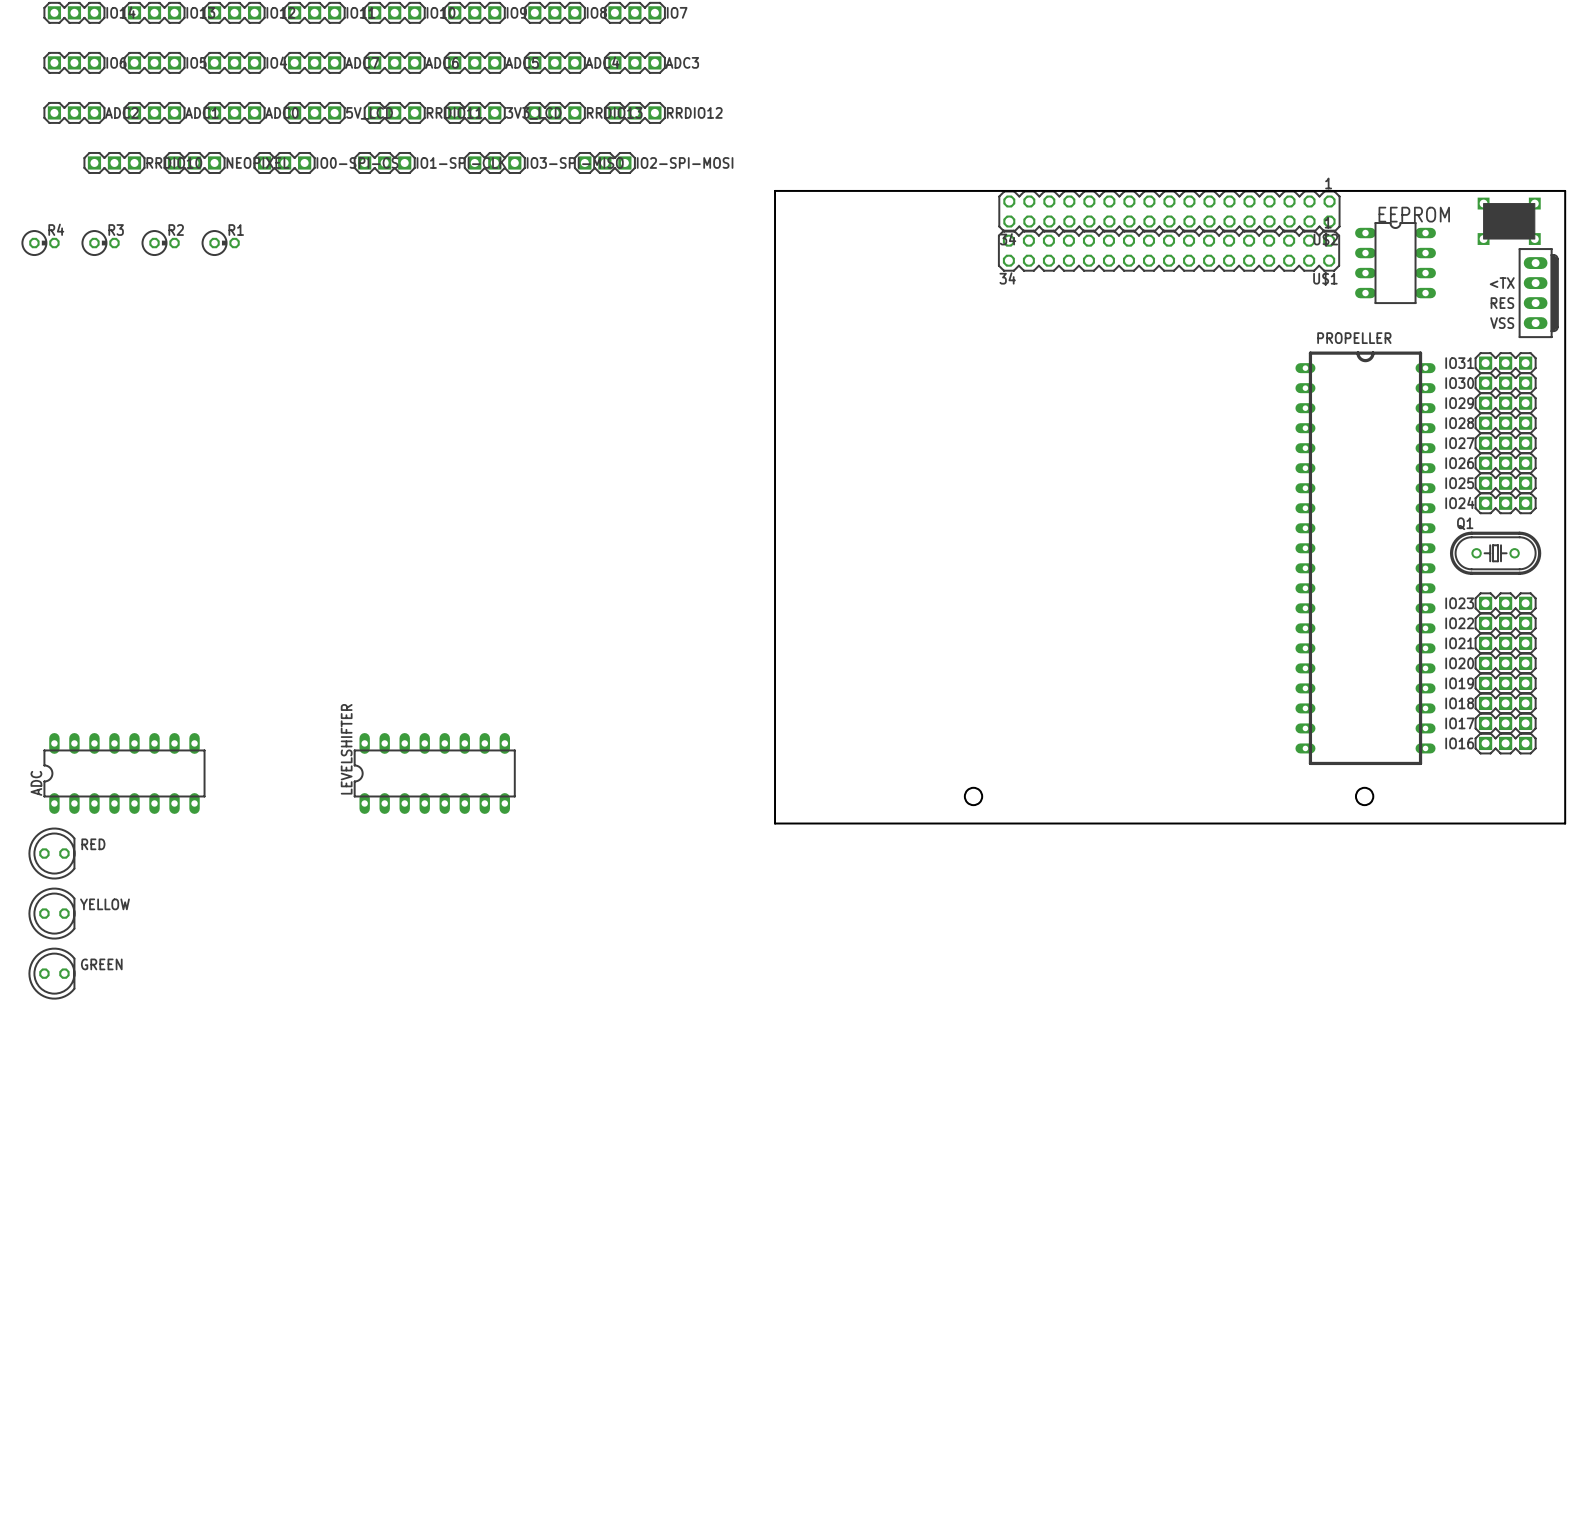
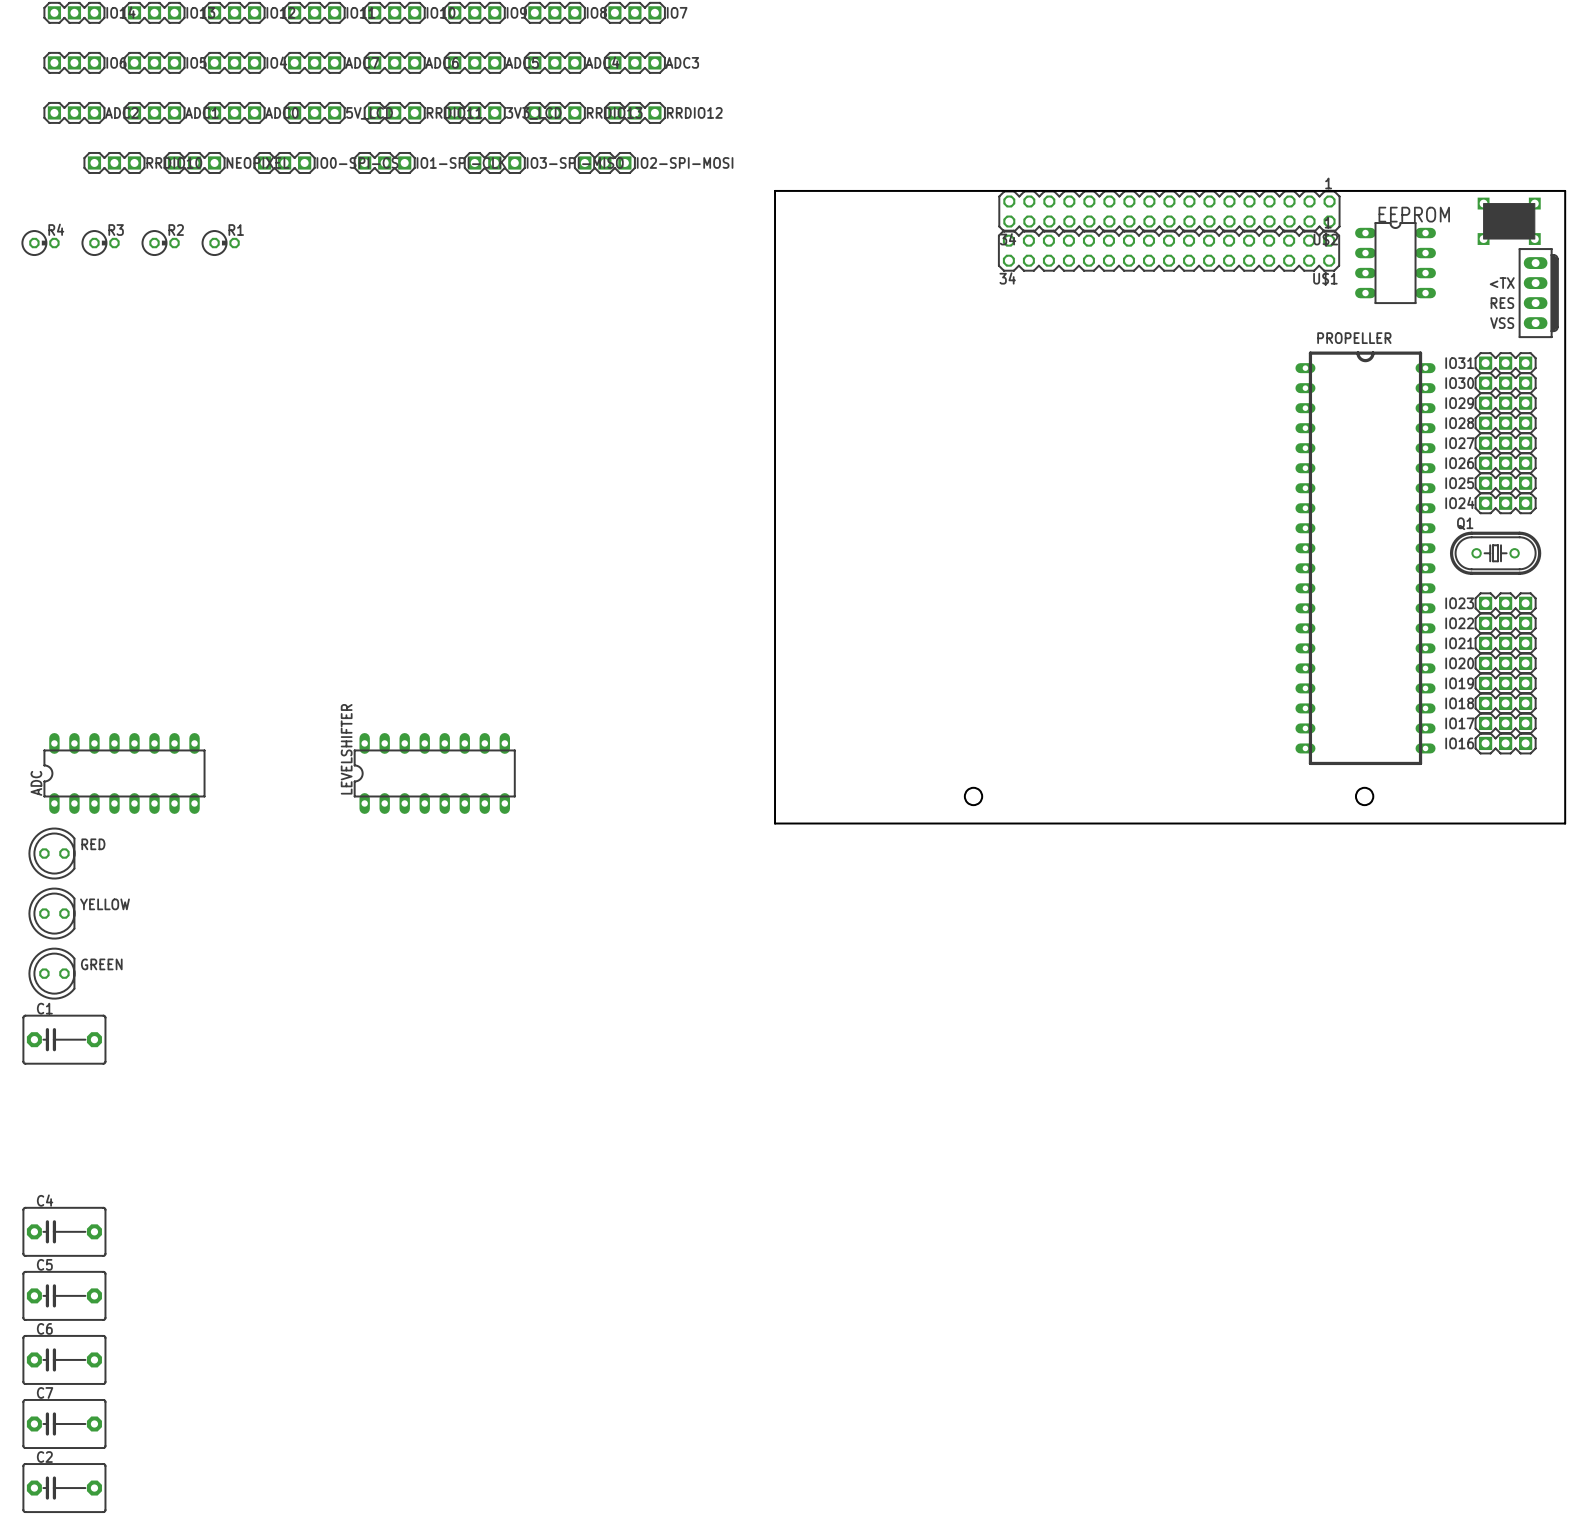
C1: none -> (64, 1039)
C4: none -> (64, 1231)
C5: none -> (64, 1295)
C6: none -> (64, 1359)
C7: none -> (64, 1423)
C2: none -> (64, 1488)

